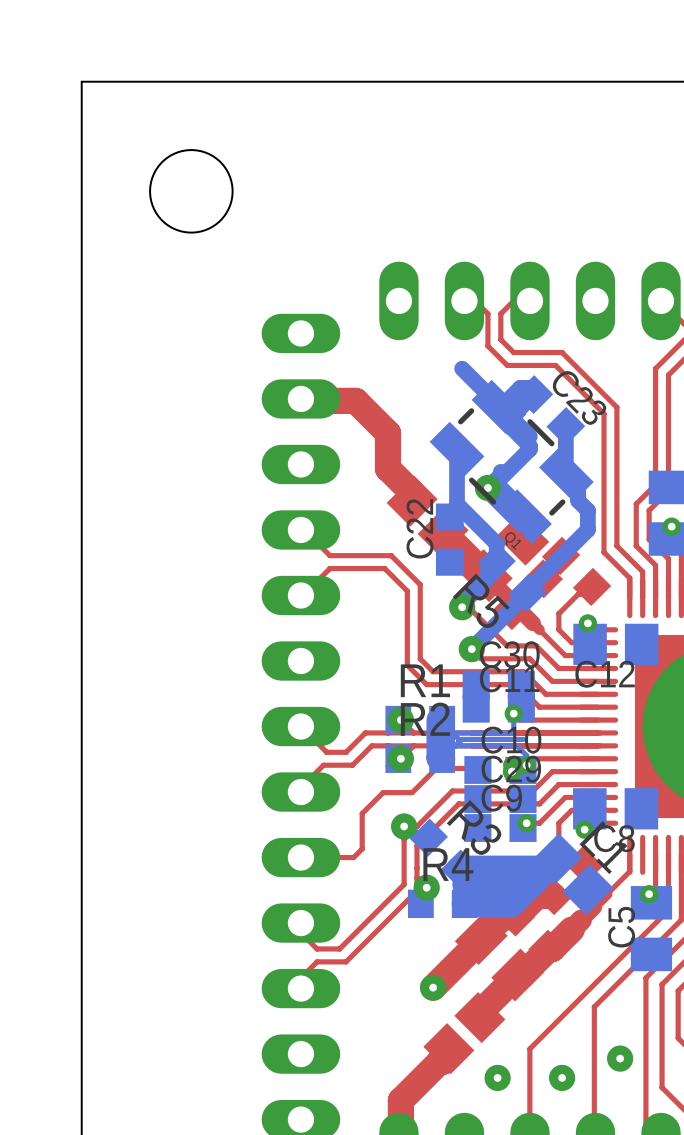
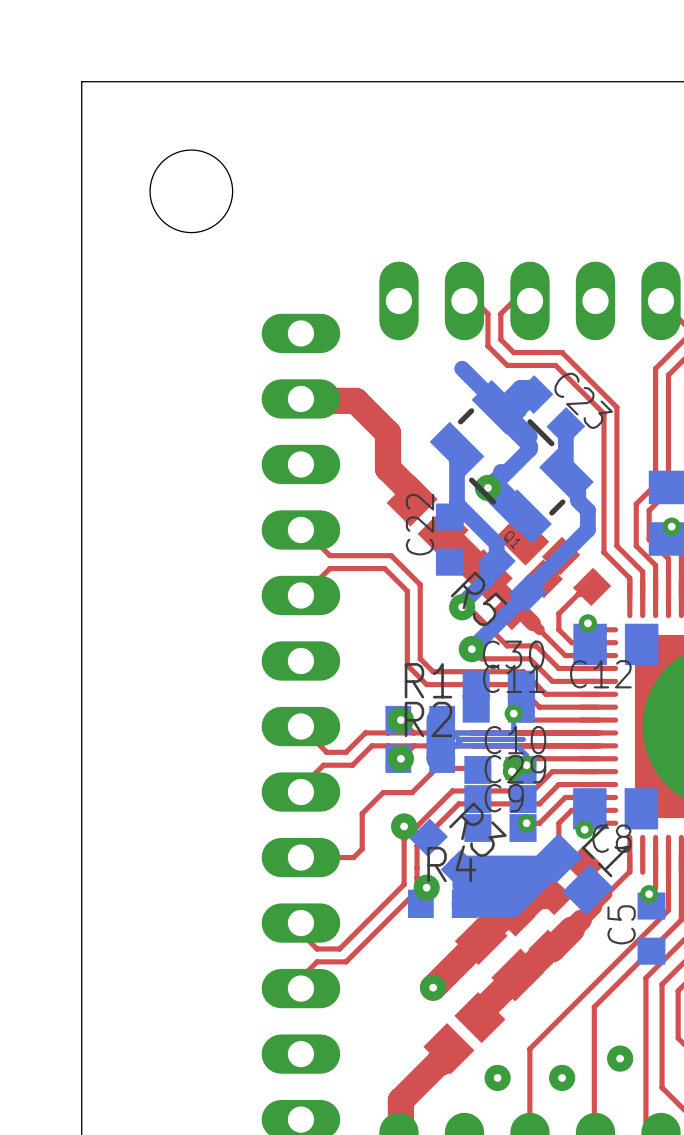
C5 footprint: [630, 886, 673, 972] -> [637, 892, 666, 965]

